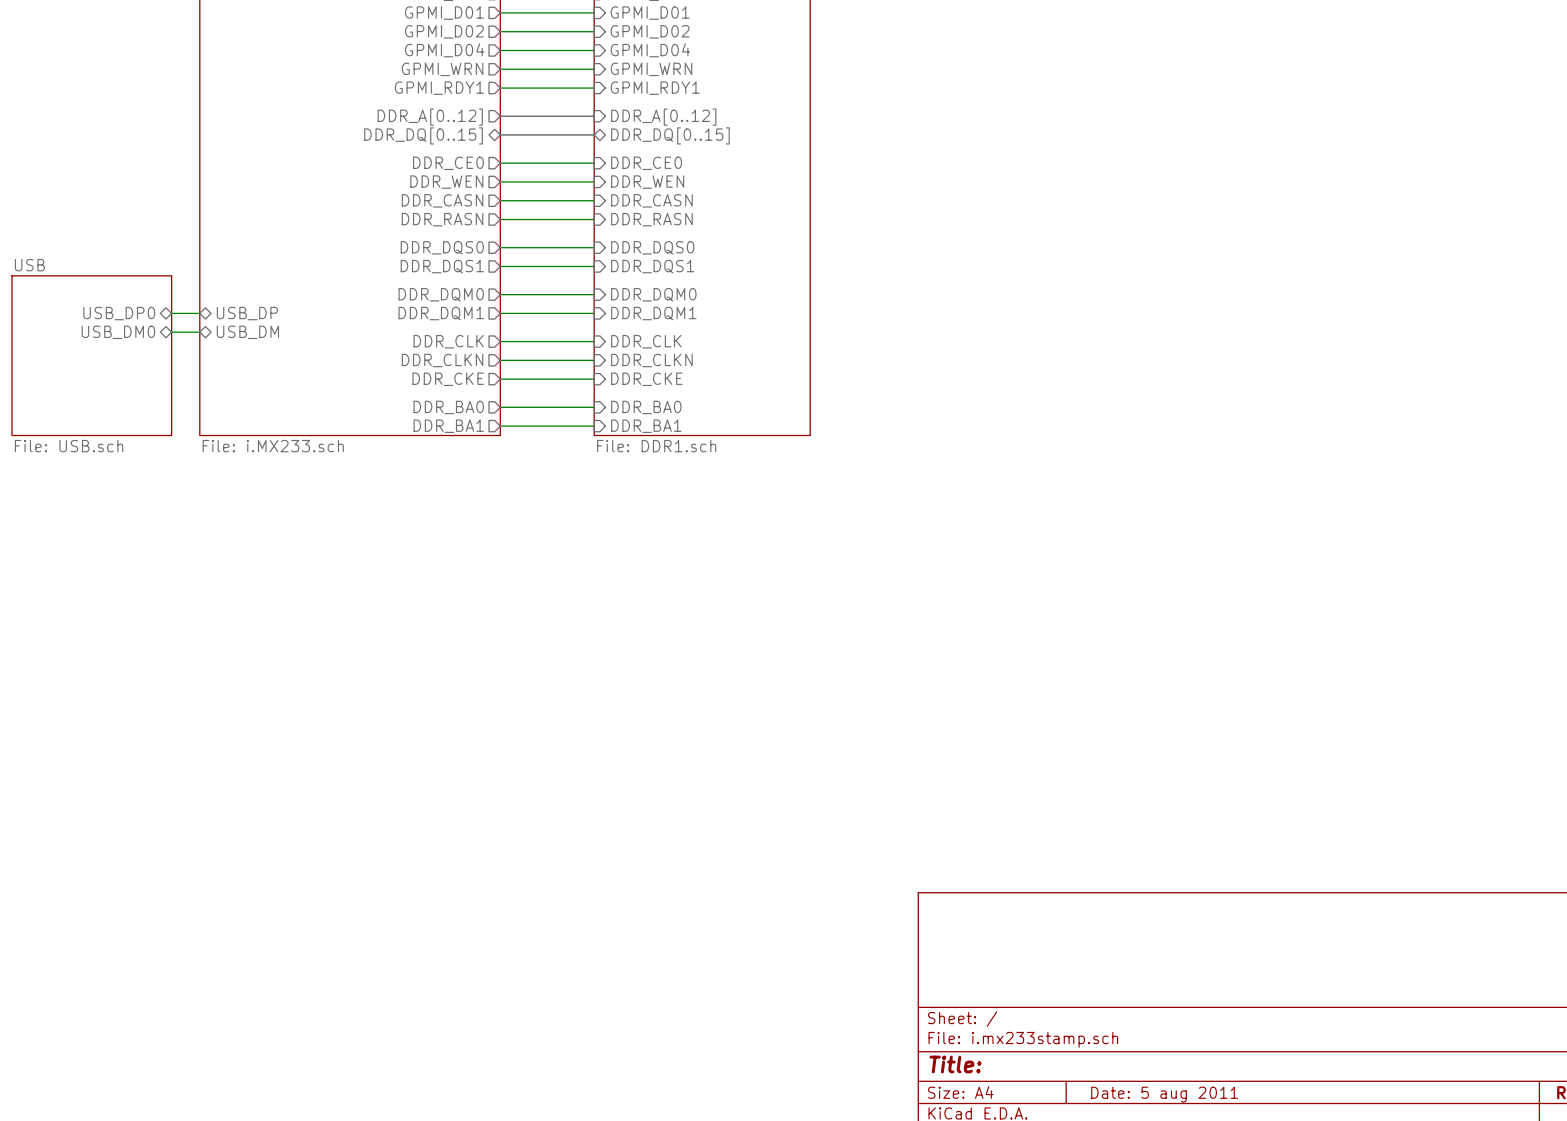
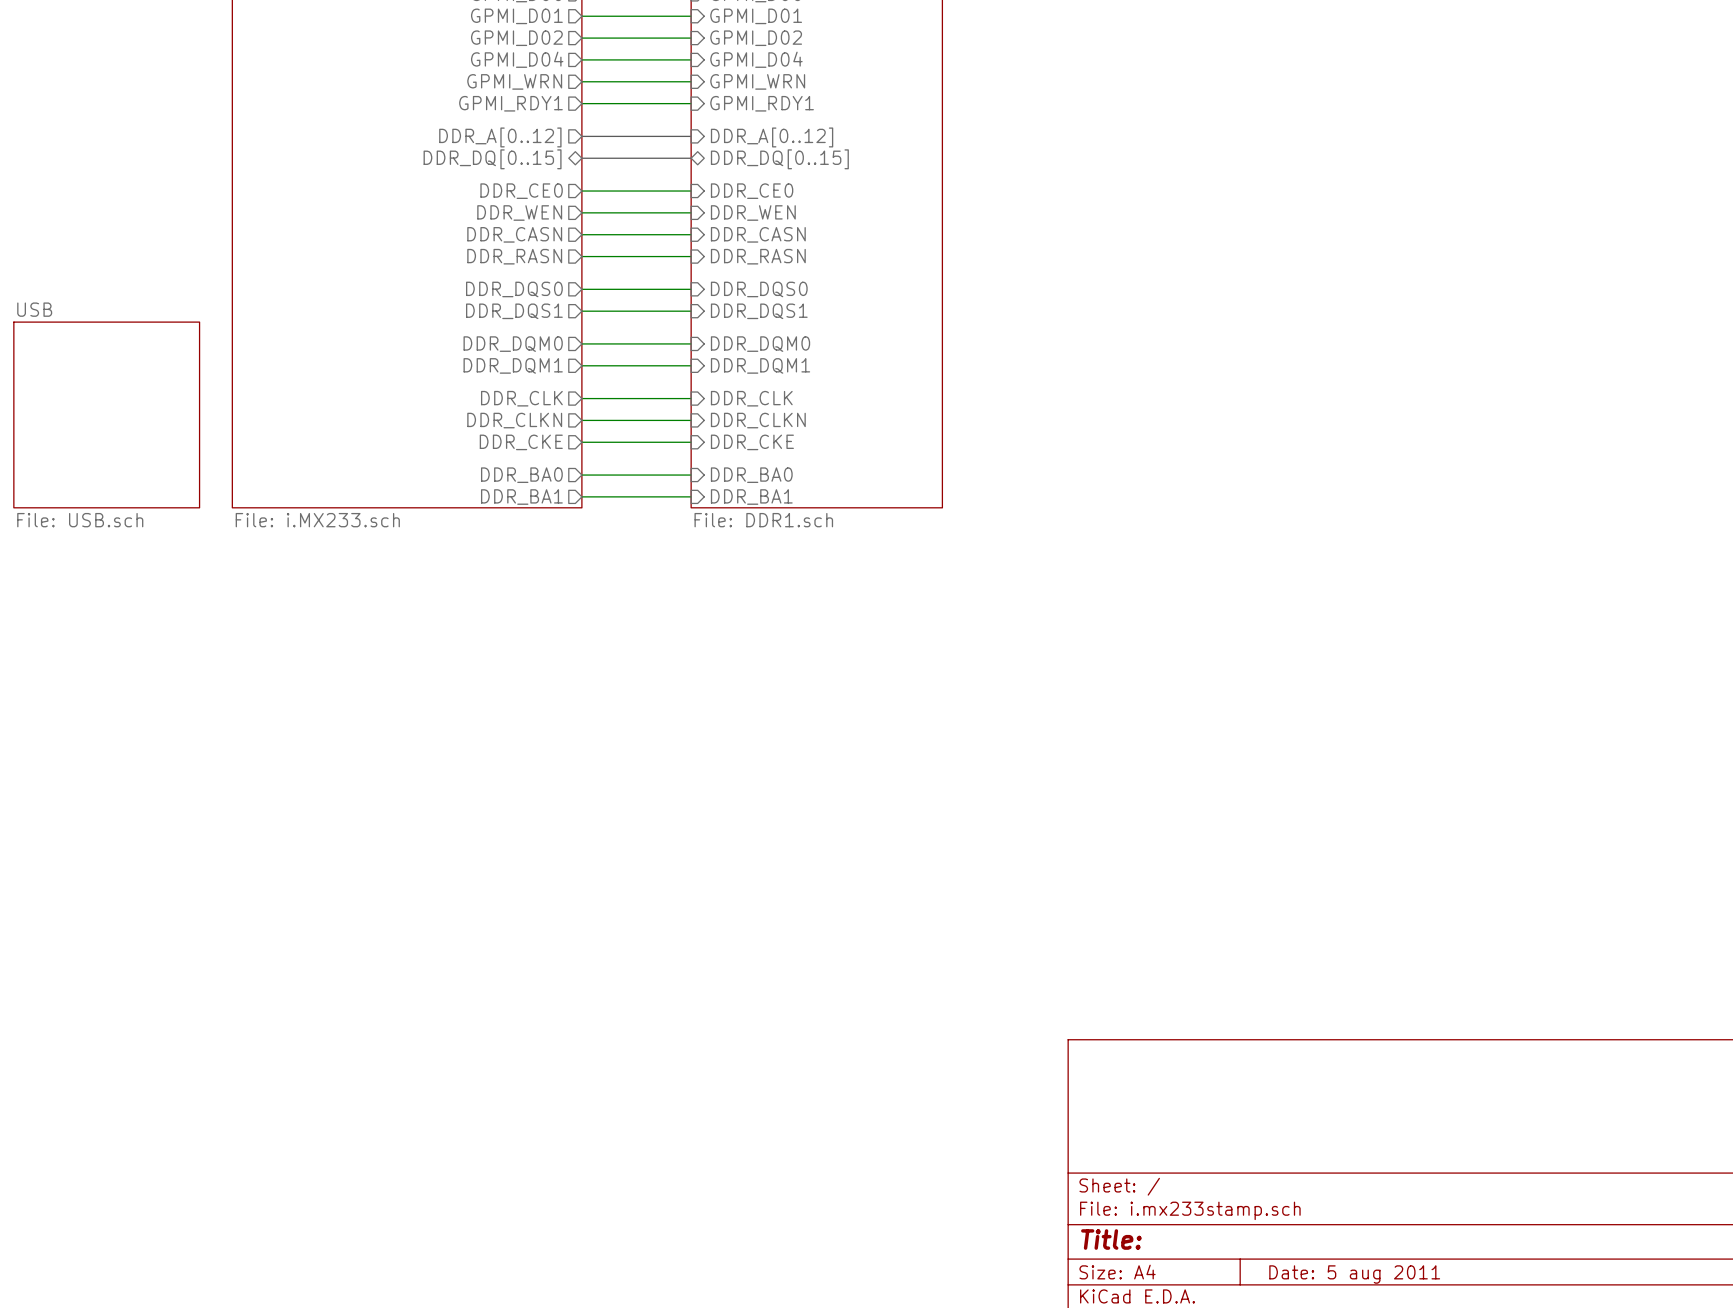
sheet pin: USB_DP0 (119, 313) -> none
wire: (171, 313) (199, 313) -> none
sheet pin: USB_DP (247, 313) -> none
sheet pin: USB_DM0 (118, 332) -> none
wire: (171, 332) (199, 332) -> none
sheet pin: USB_DM (247, 332) -> none

